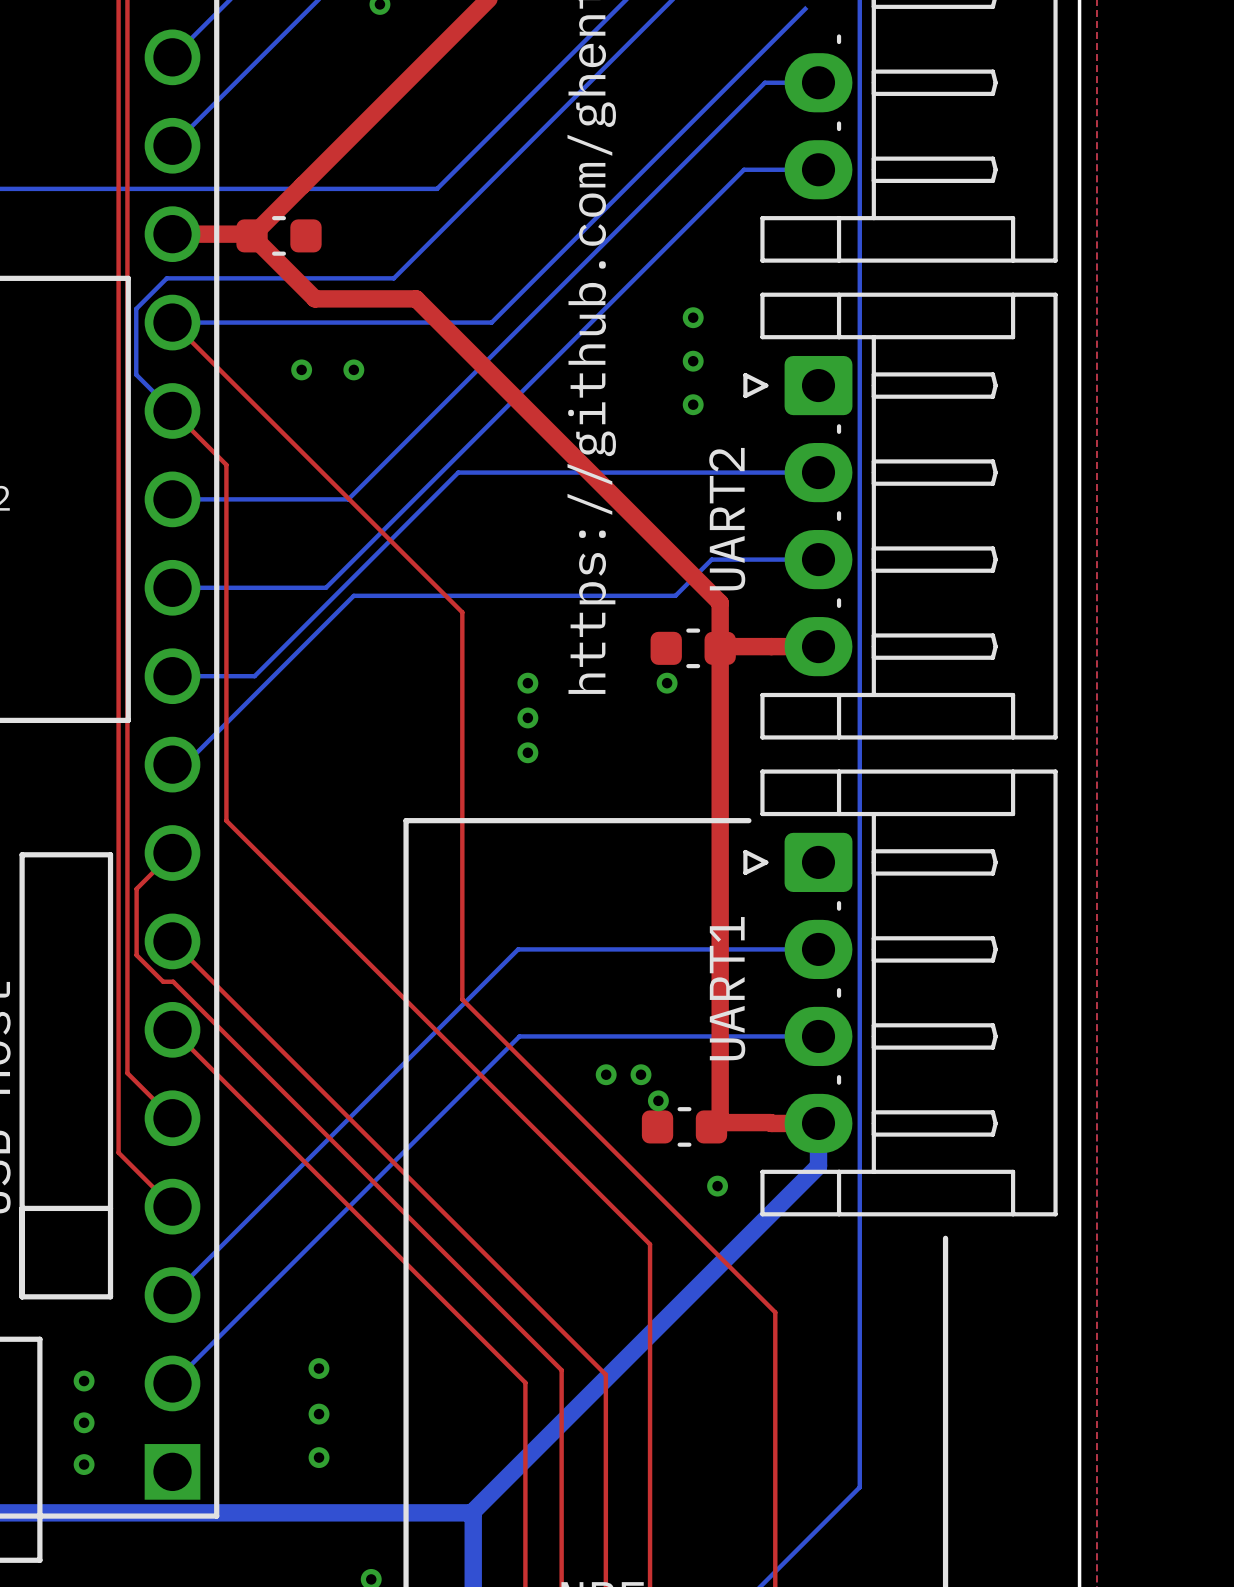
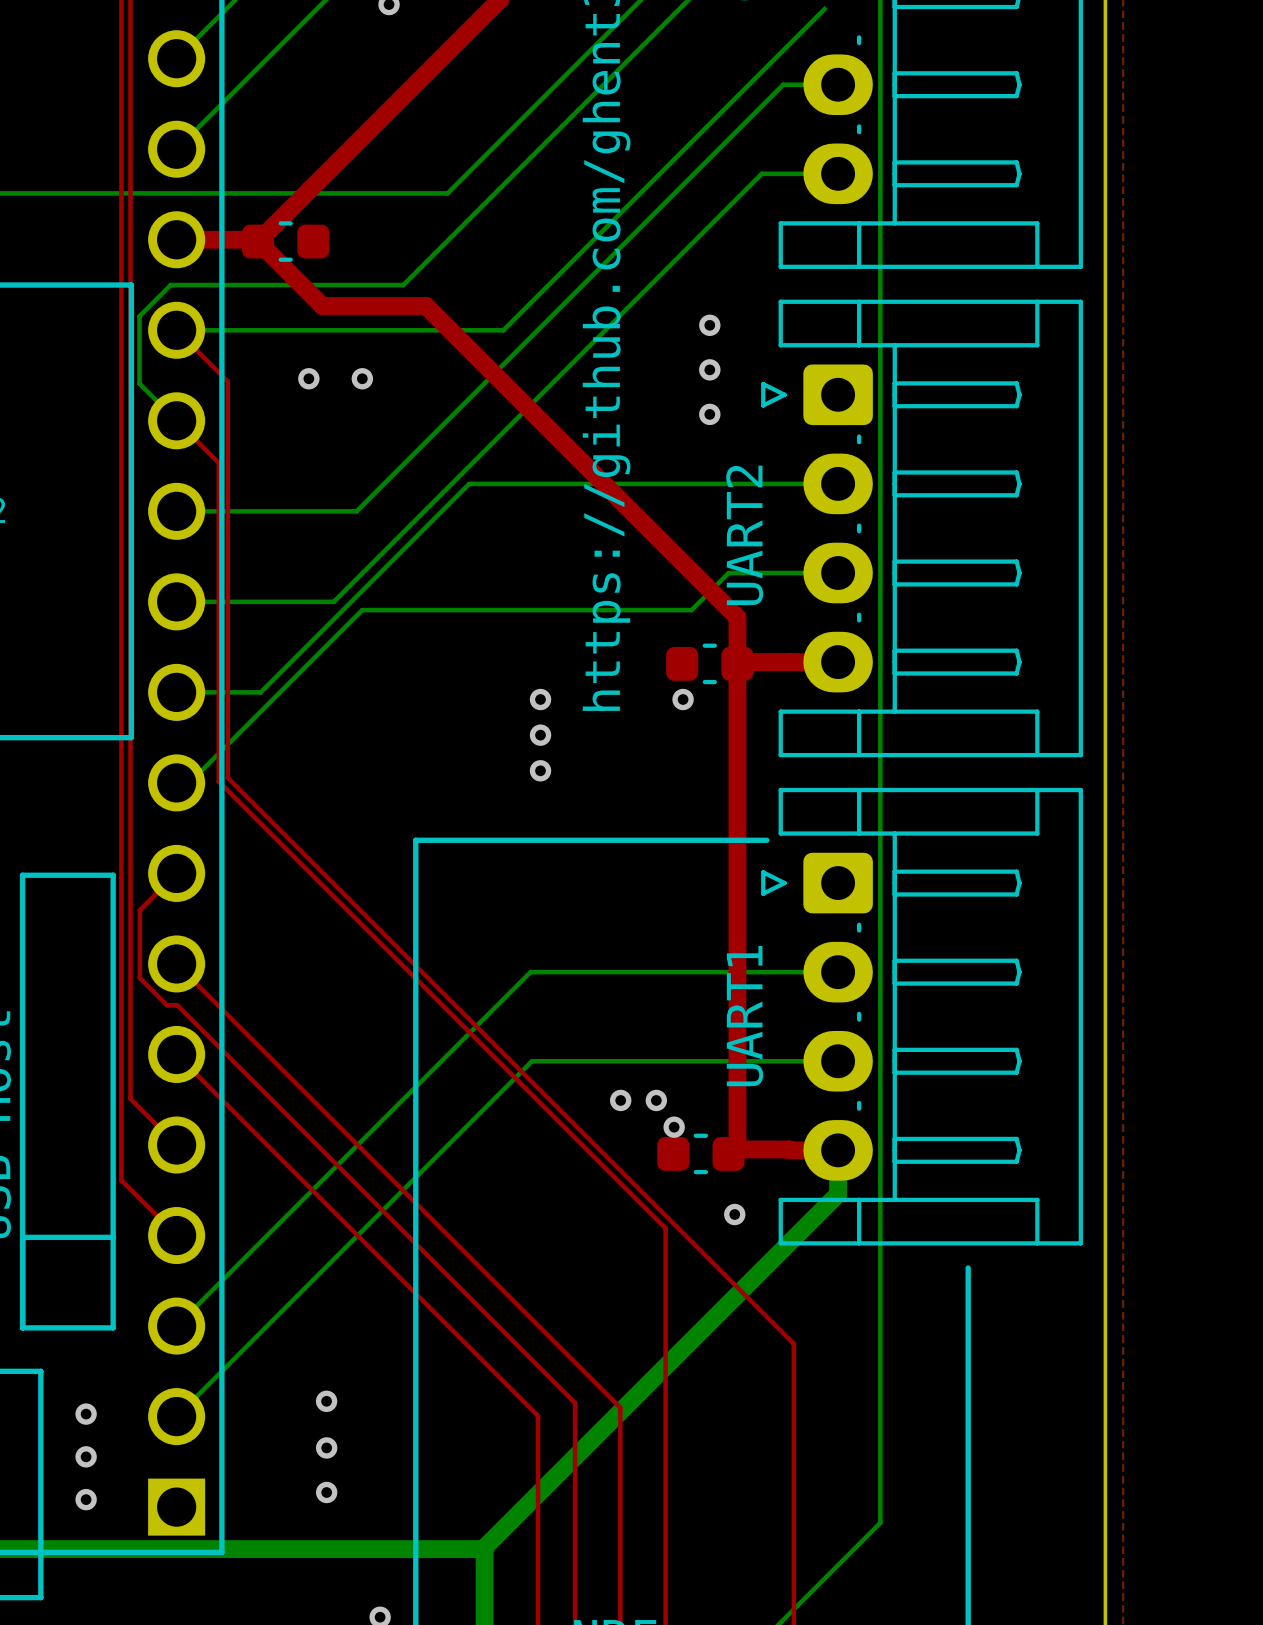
top track: (222, 372) (462, 612) (462, 999) -> (227, 381) (227, 777) (473, 1023)
top track: (213, 452) (226, 464) (226, 820) (650, 1244) -> (218, 462) (218, 781) (665, 1228) (665, 1274)

